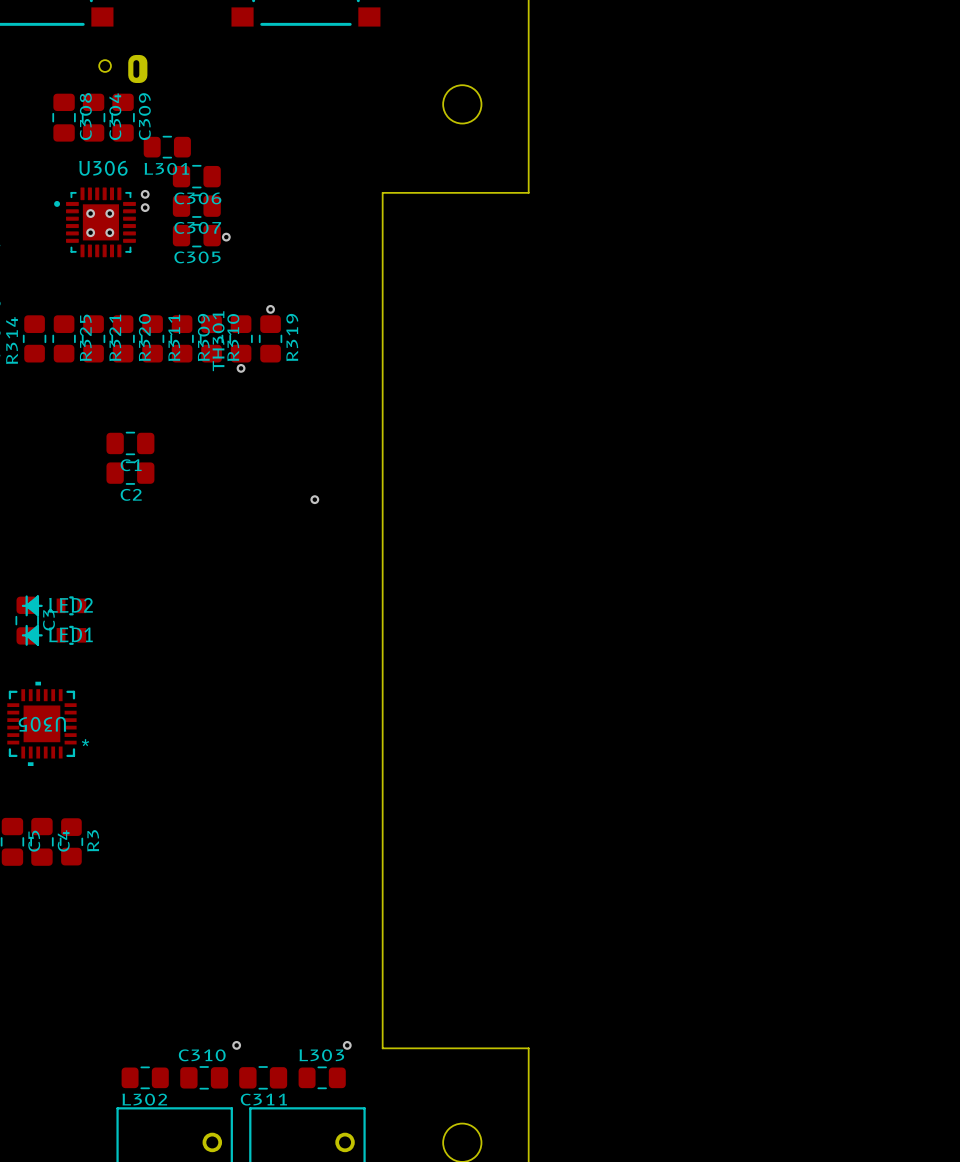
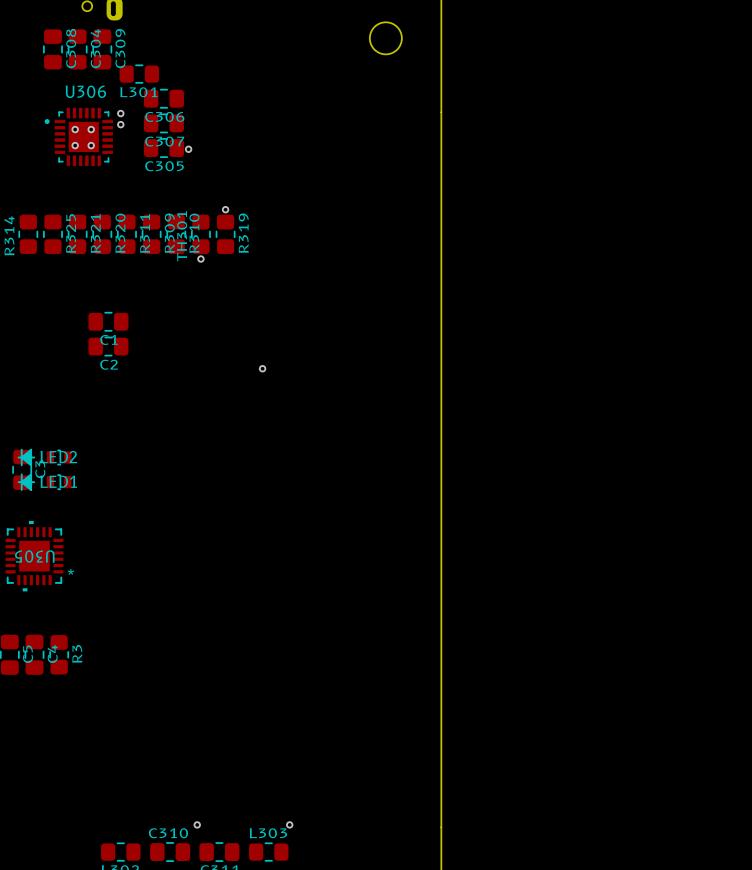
board edge: (528, 192) (382, 192) (382, 1048) (528, 1048) -> (441, 112) (441, 827)

